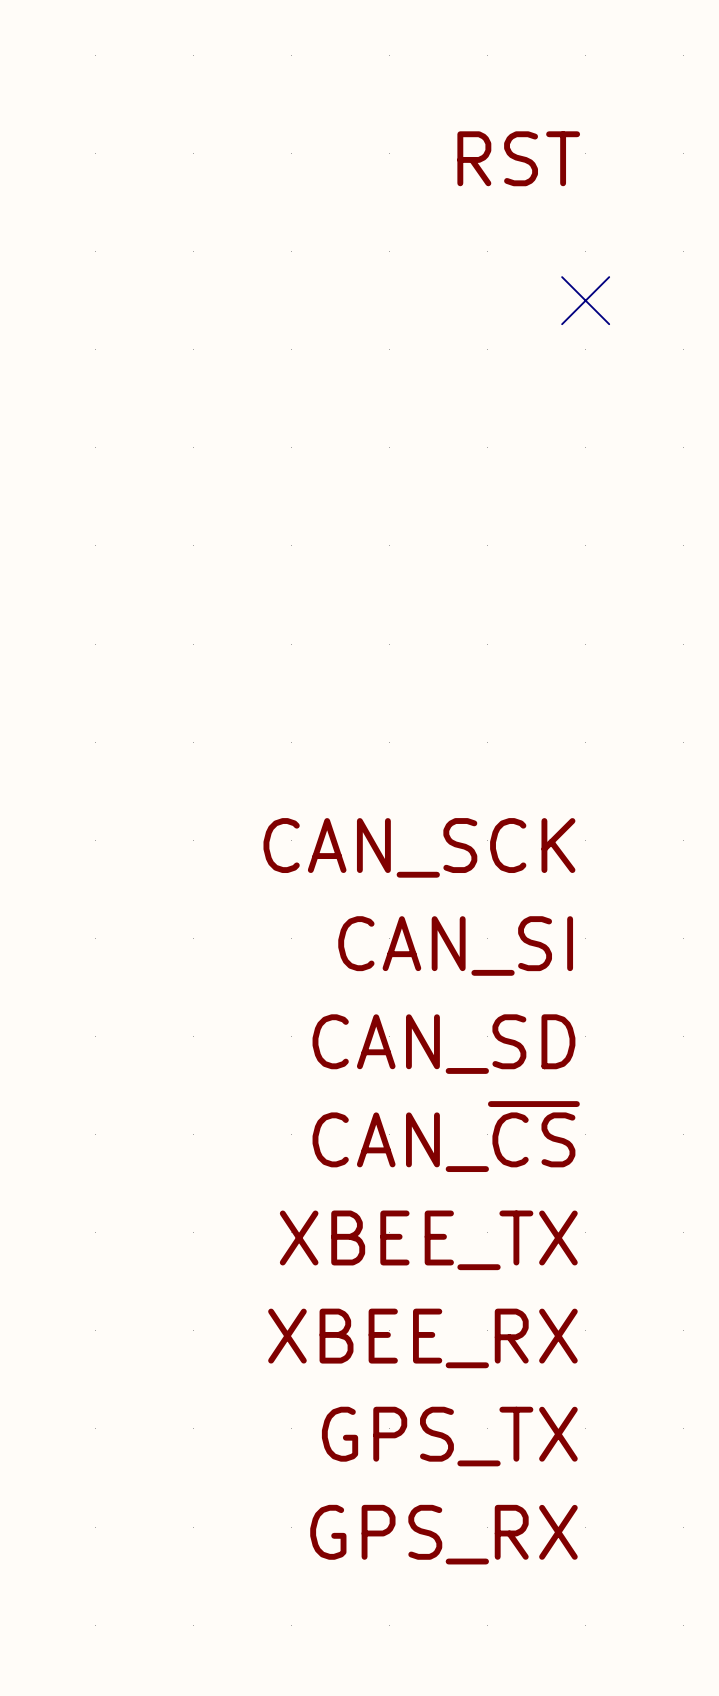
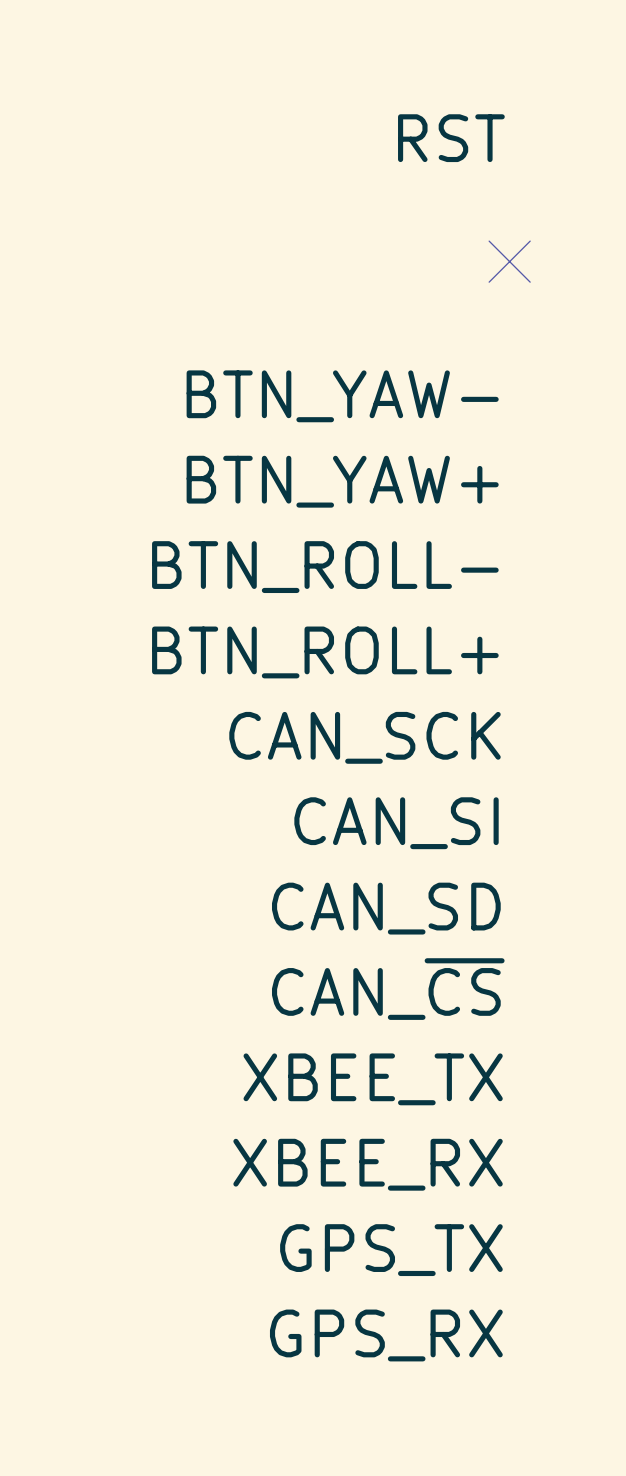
label: none -> BTN_YAW- (342, 396)
label: none -> BTN_YAW+ (342, 481)
label: none -> BTN_ROLL- (325, 567)
label: none -> BTN_ROLL+ (325, 652)

